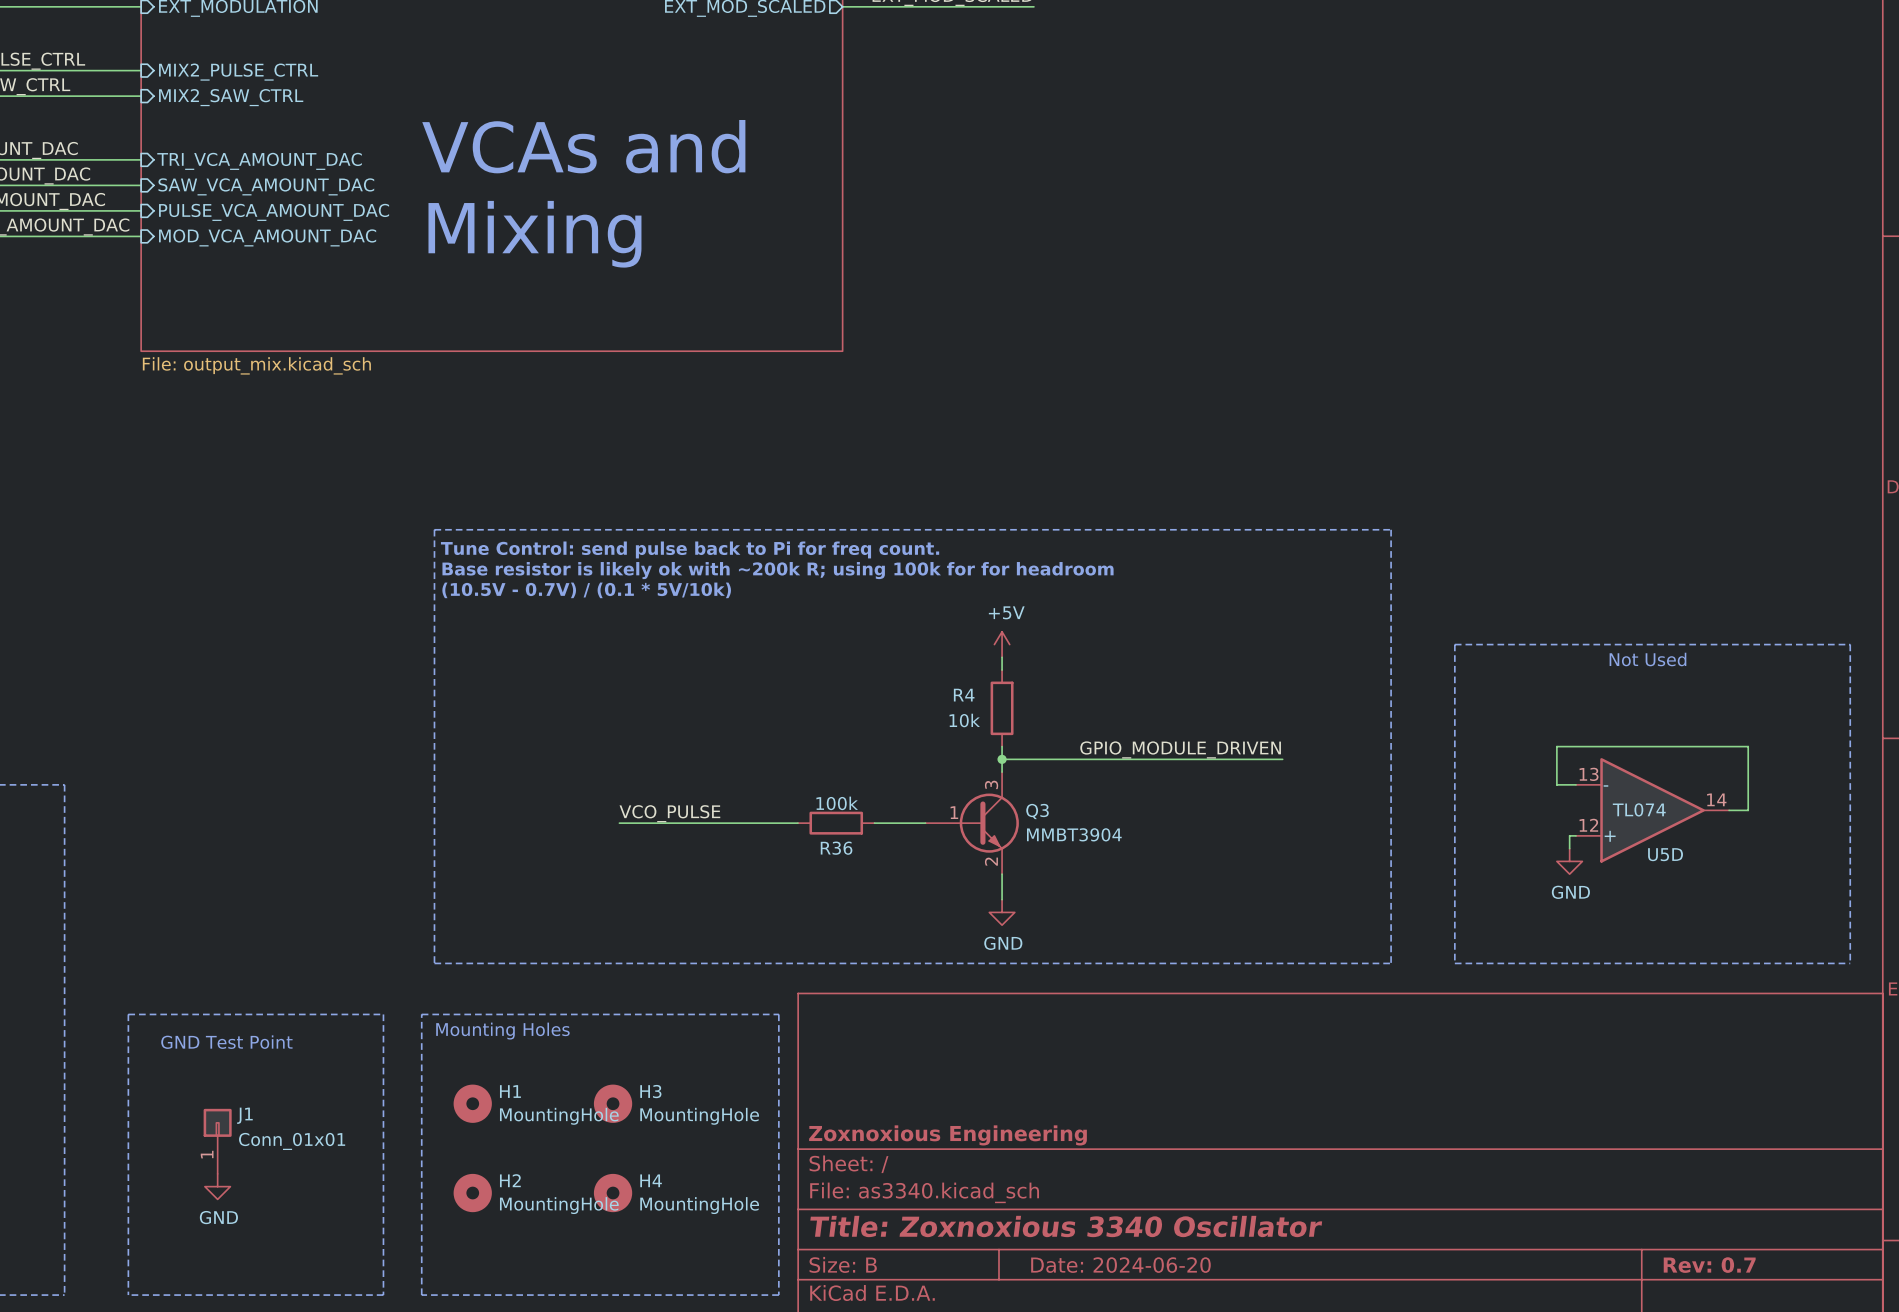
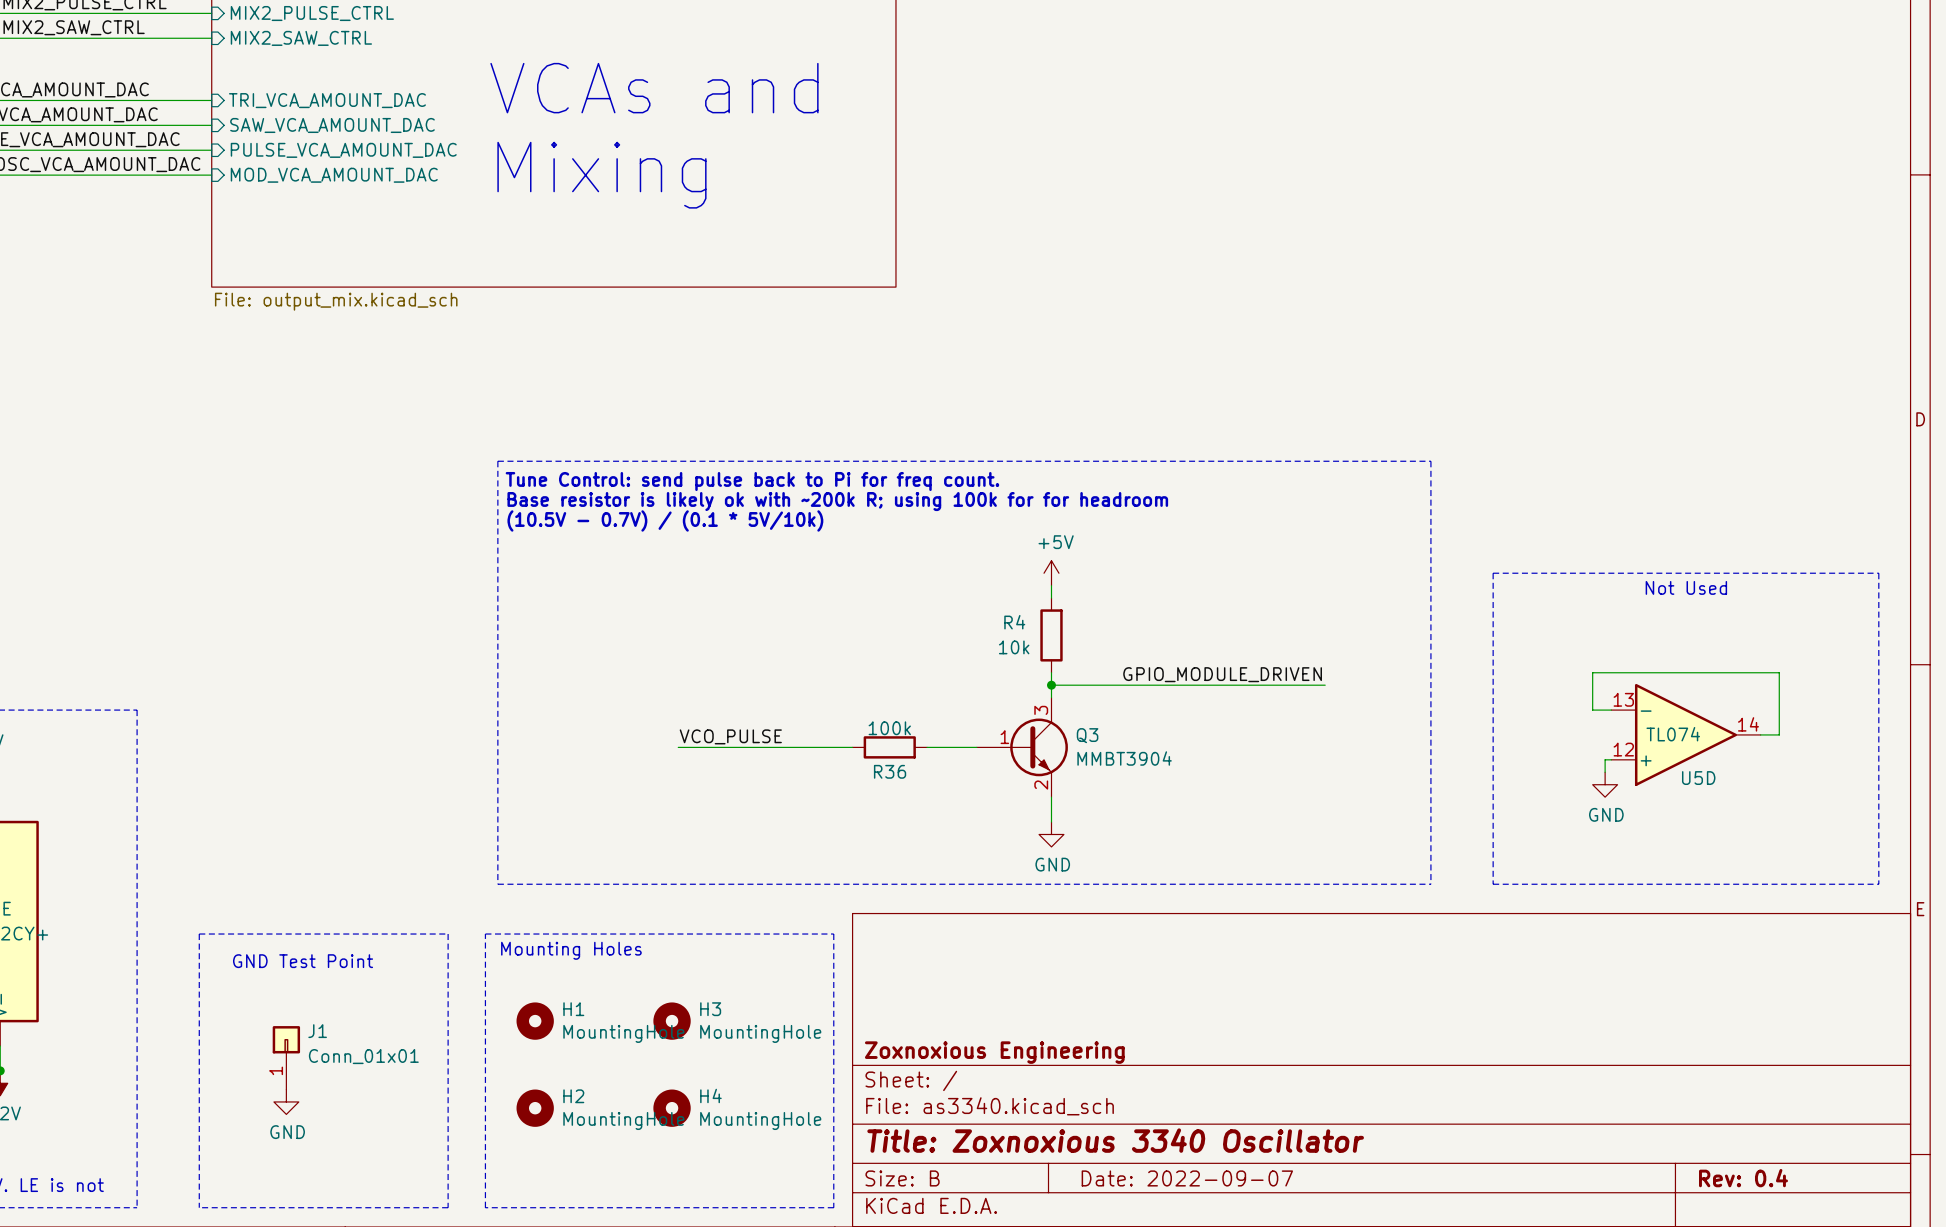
title block: Date: 2024-06-20 (1120, 1265) -> Date: 2022-09-07 (1187, 1178)
title block: Rev: 0.7 (1709, 1265) -> Rev: 0.4 (1743, 1178)

